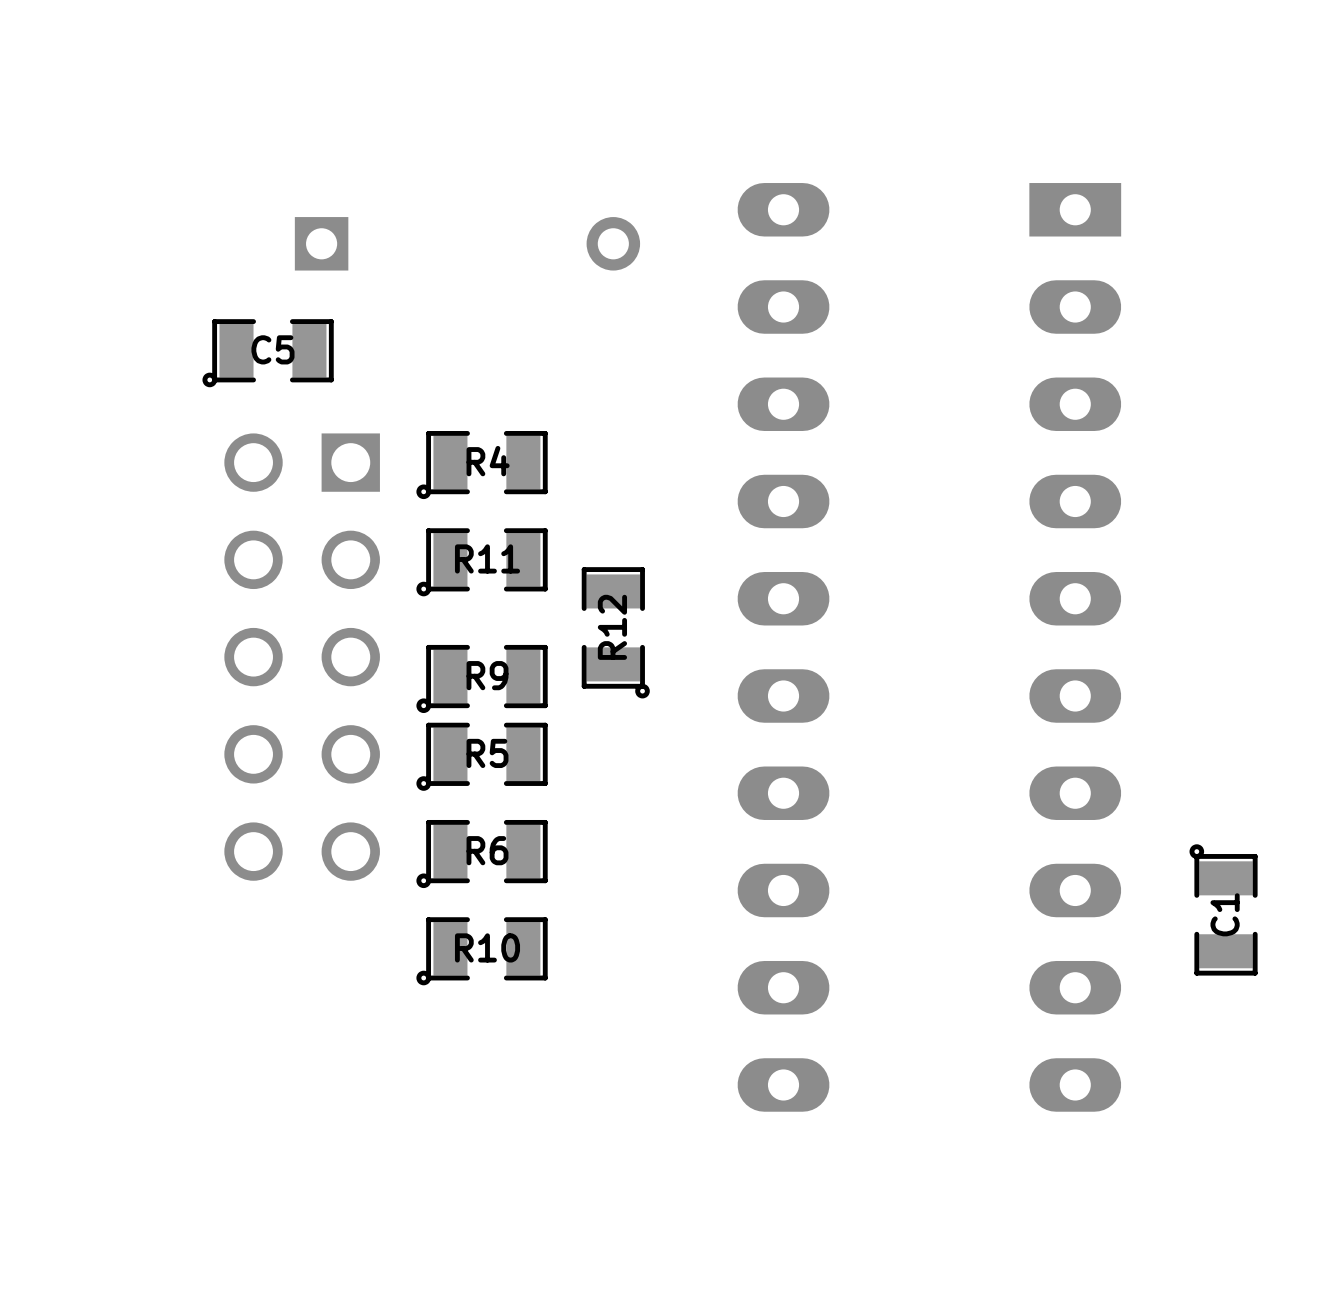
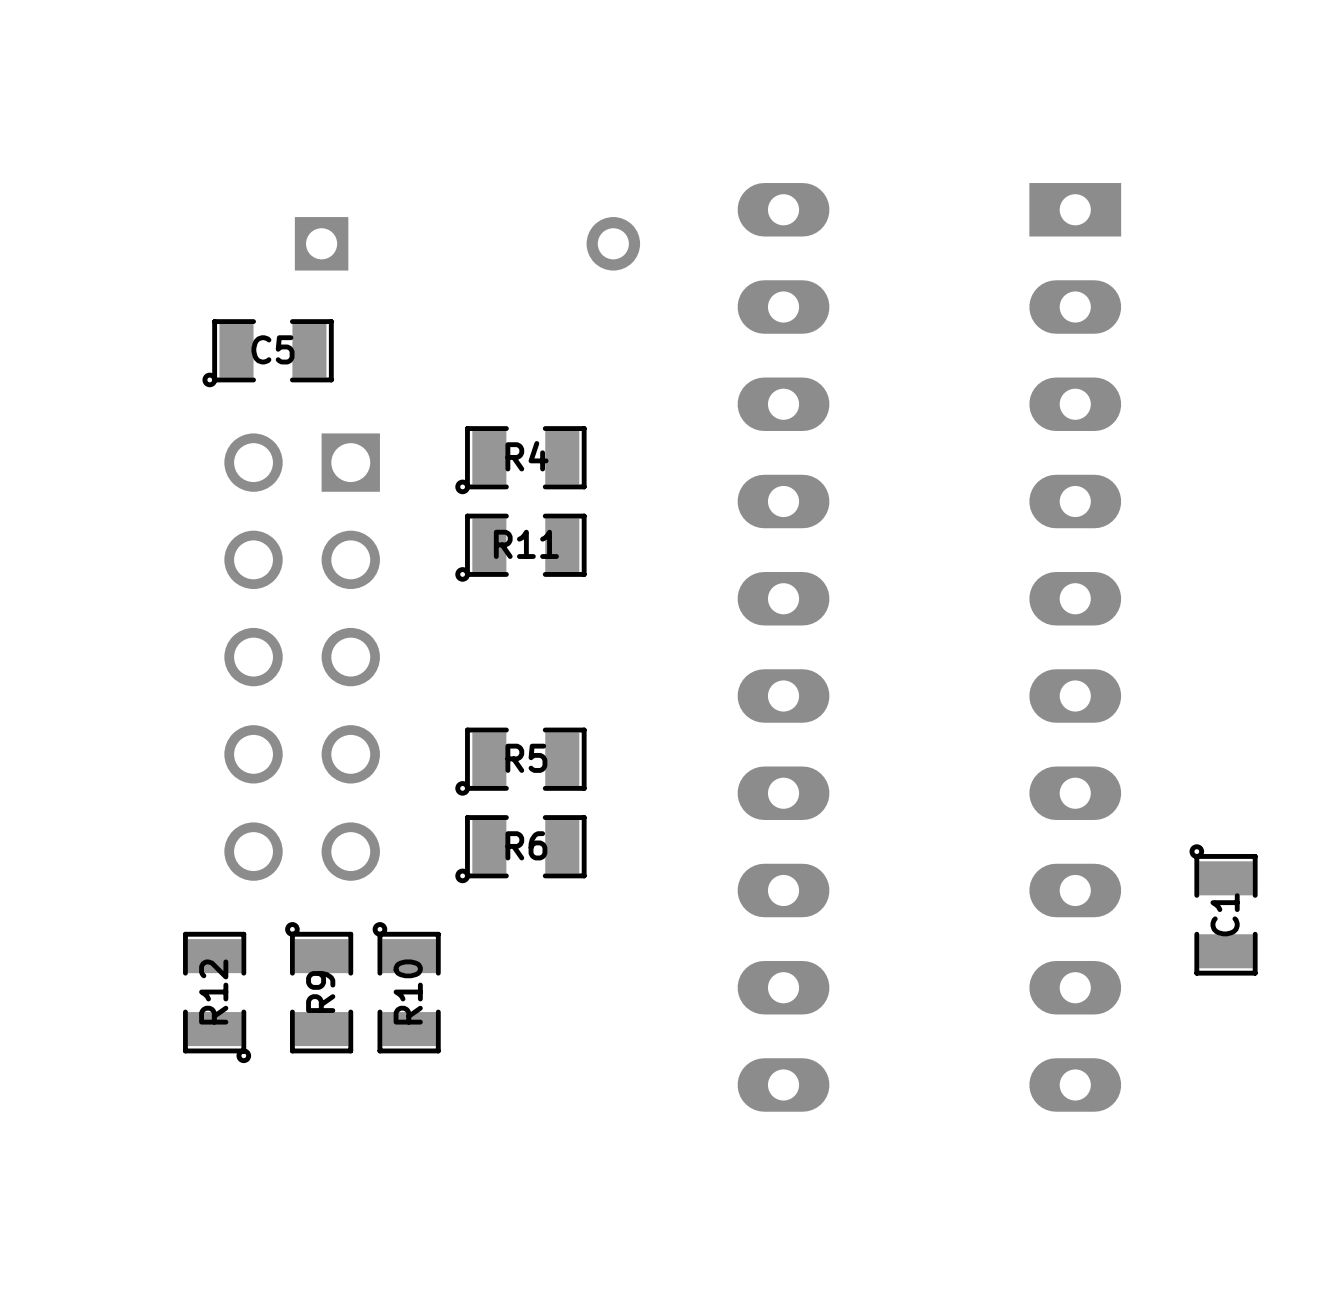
R4 position: (482, 465) -> (520, 460)
R11 position: (482, 562) -> (520, 547)
R12 position: (615, 632) -> (217, 997)
R9 rotation: 0° (482, 678) -> 90° clockwise (319, 987)
R9 position: (482, 678) -> (319, 987)
R5 position: (482, 756) -> (520, 761)
R6 position: (482, 854) -> (520, 849)
R10 rotation: 0° (482, 951) -> 90° clockwise (406, 987)
R10 position: (482, 951) -> (406, 987)

